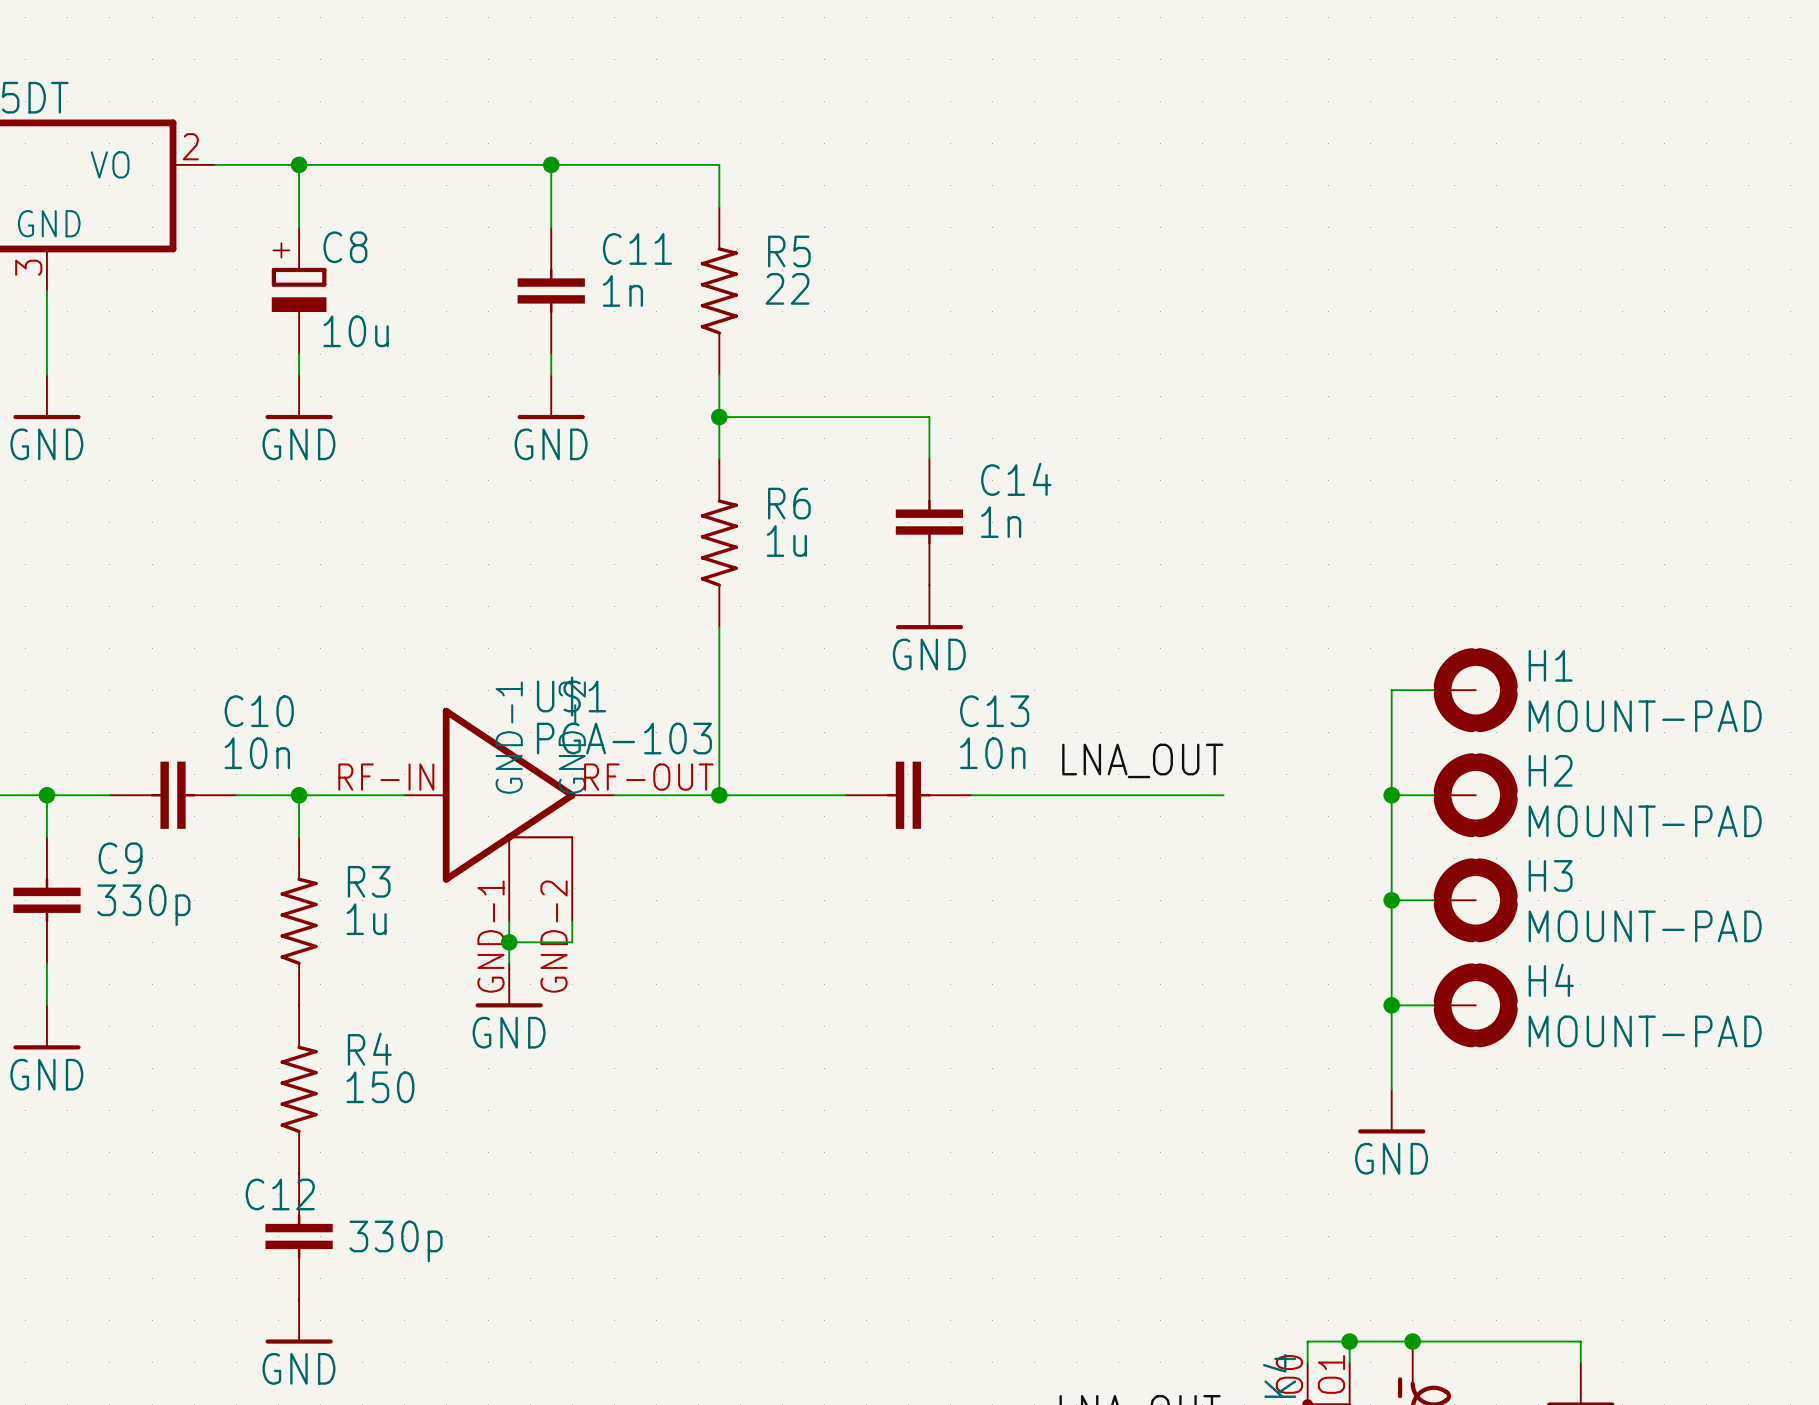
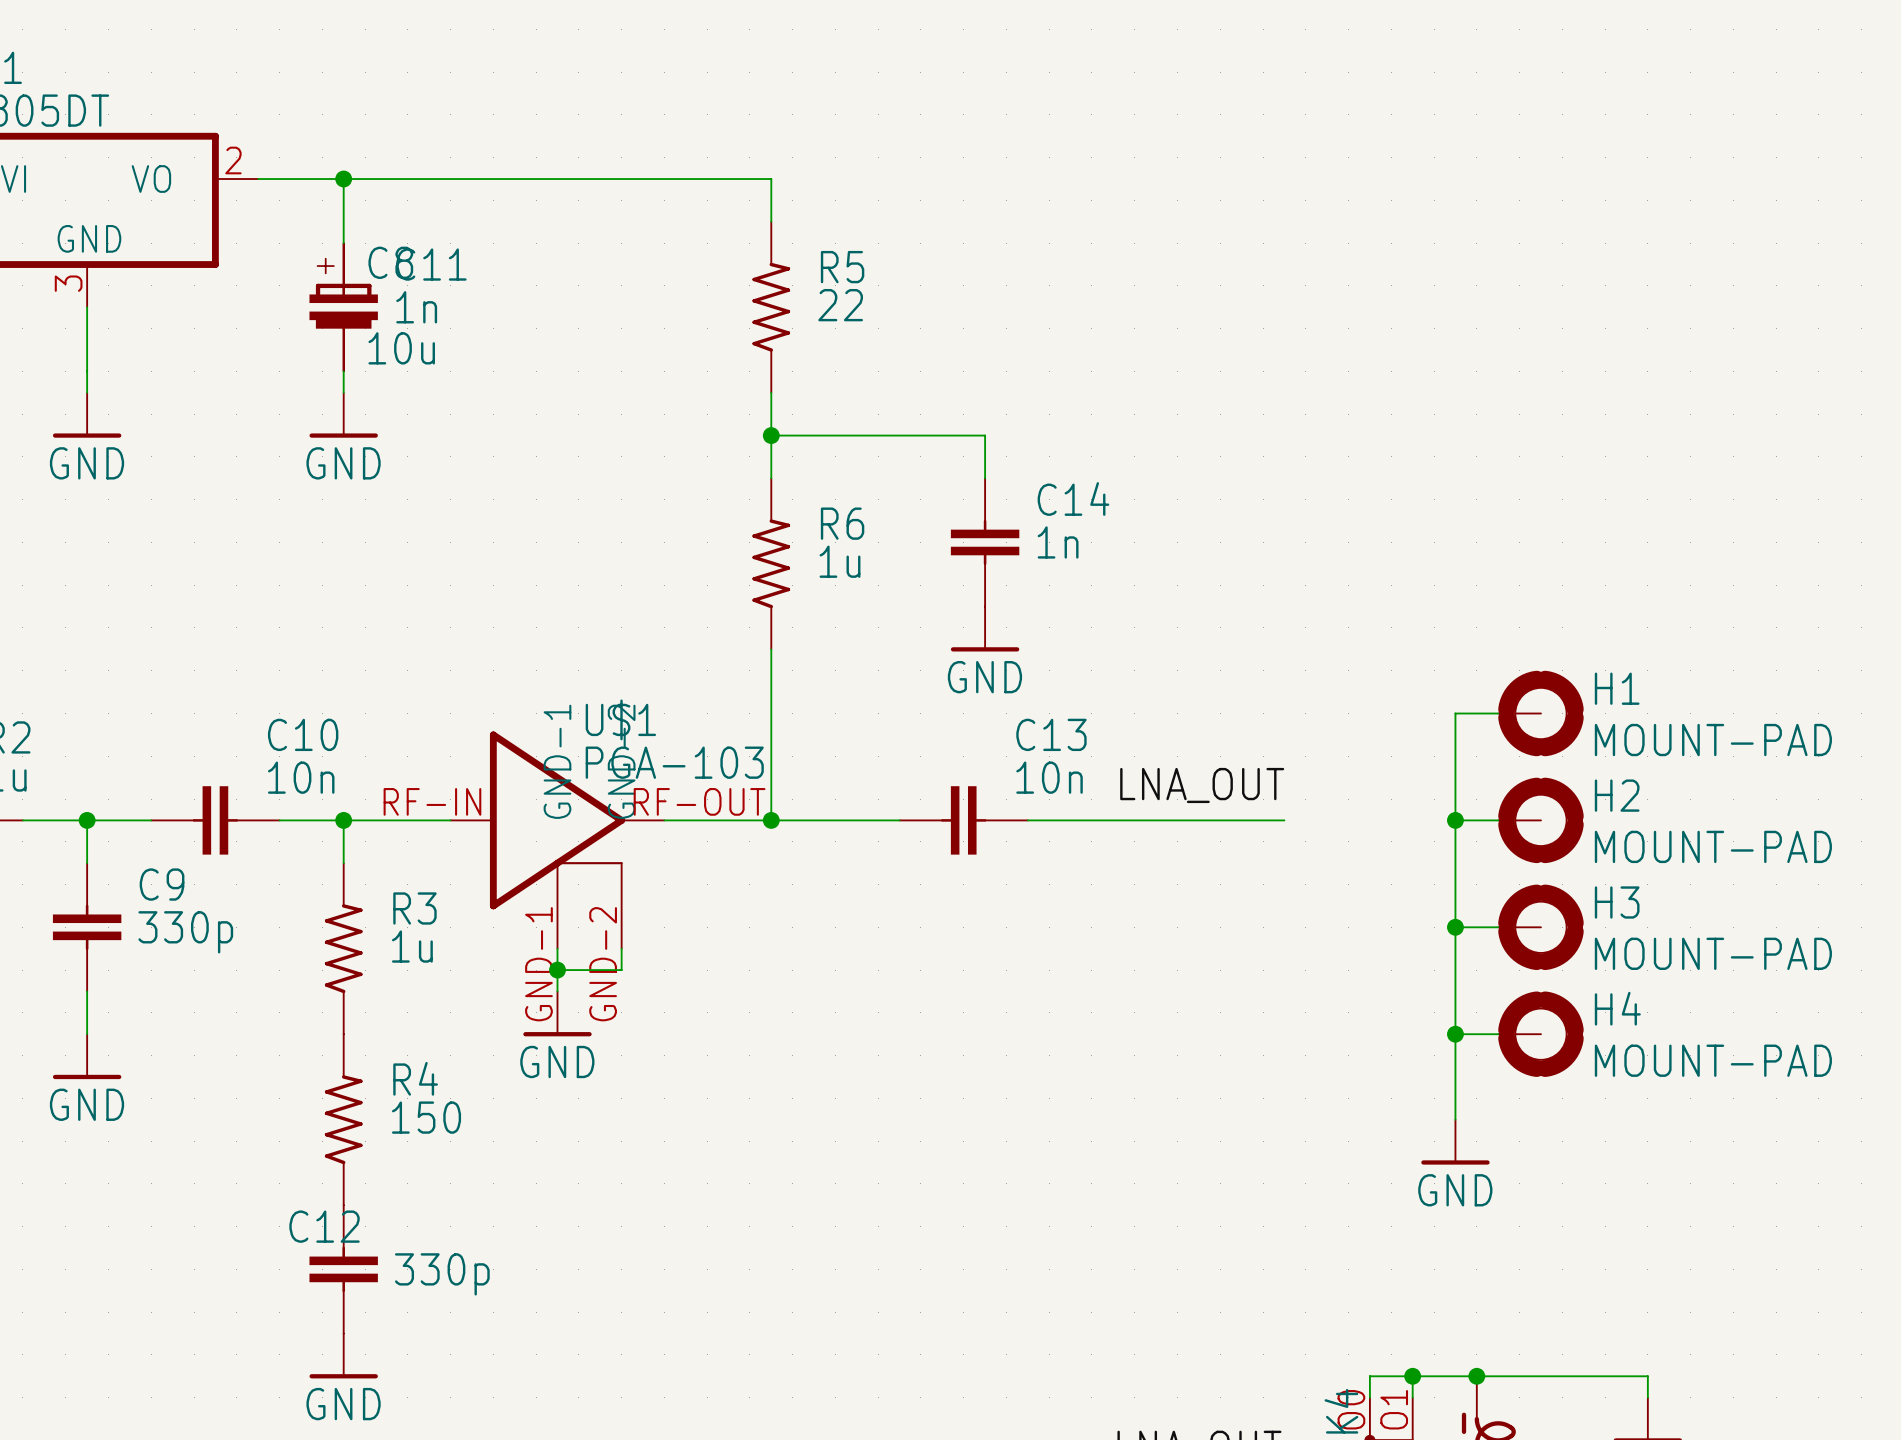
wire: (551, 164) (551, 227) -> none
junction: (551, 164) -> none
C11 position: (551, 290) -> (343, 307)
wire: (551, 354) (551, 375) -> none
power symbol: GND (551, 397) -> none

